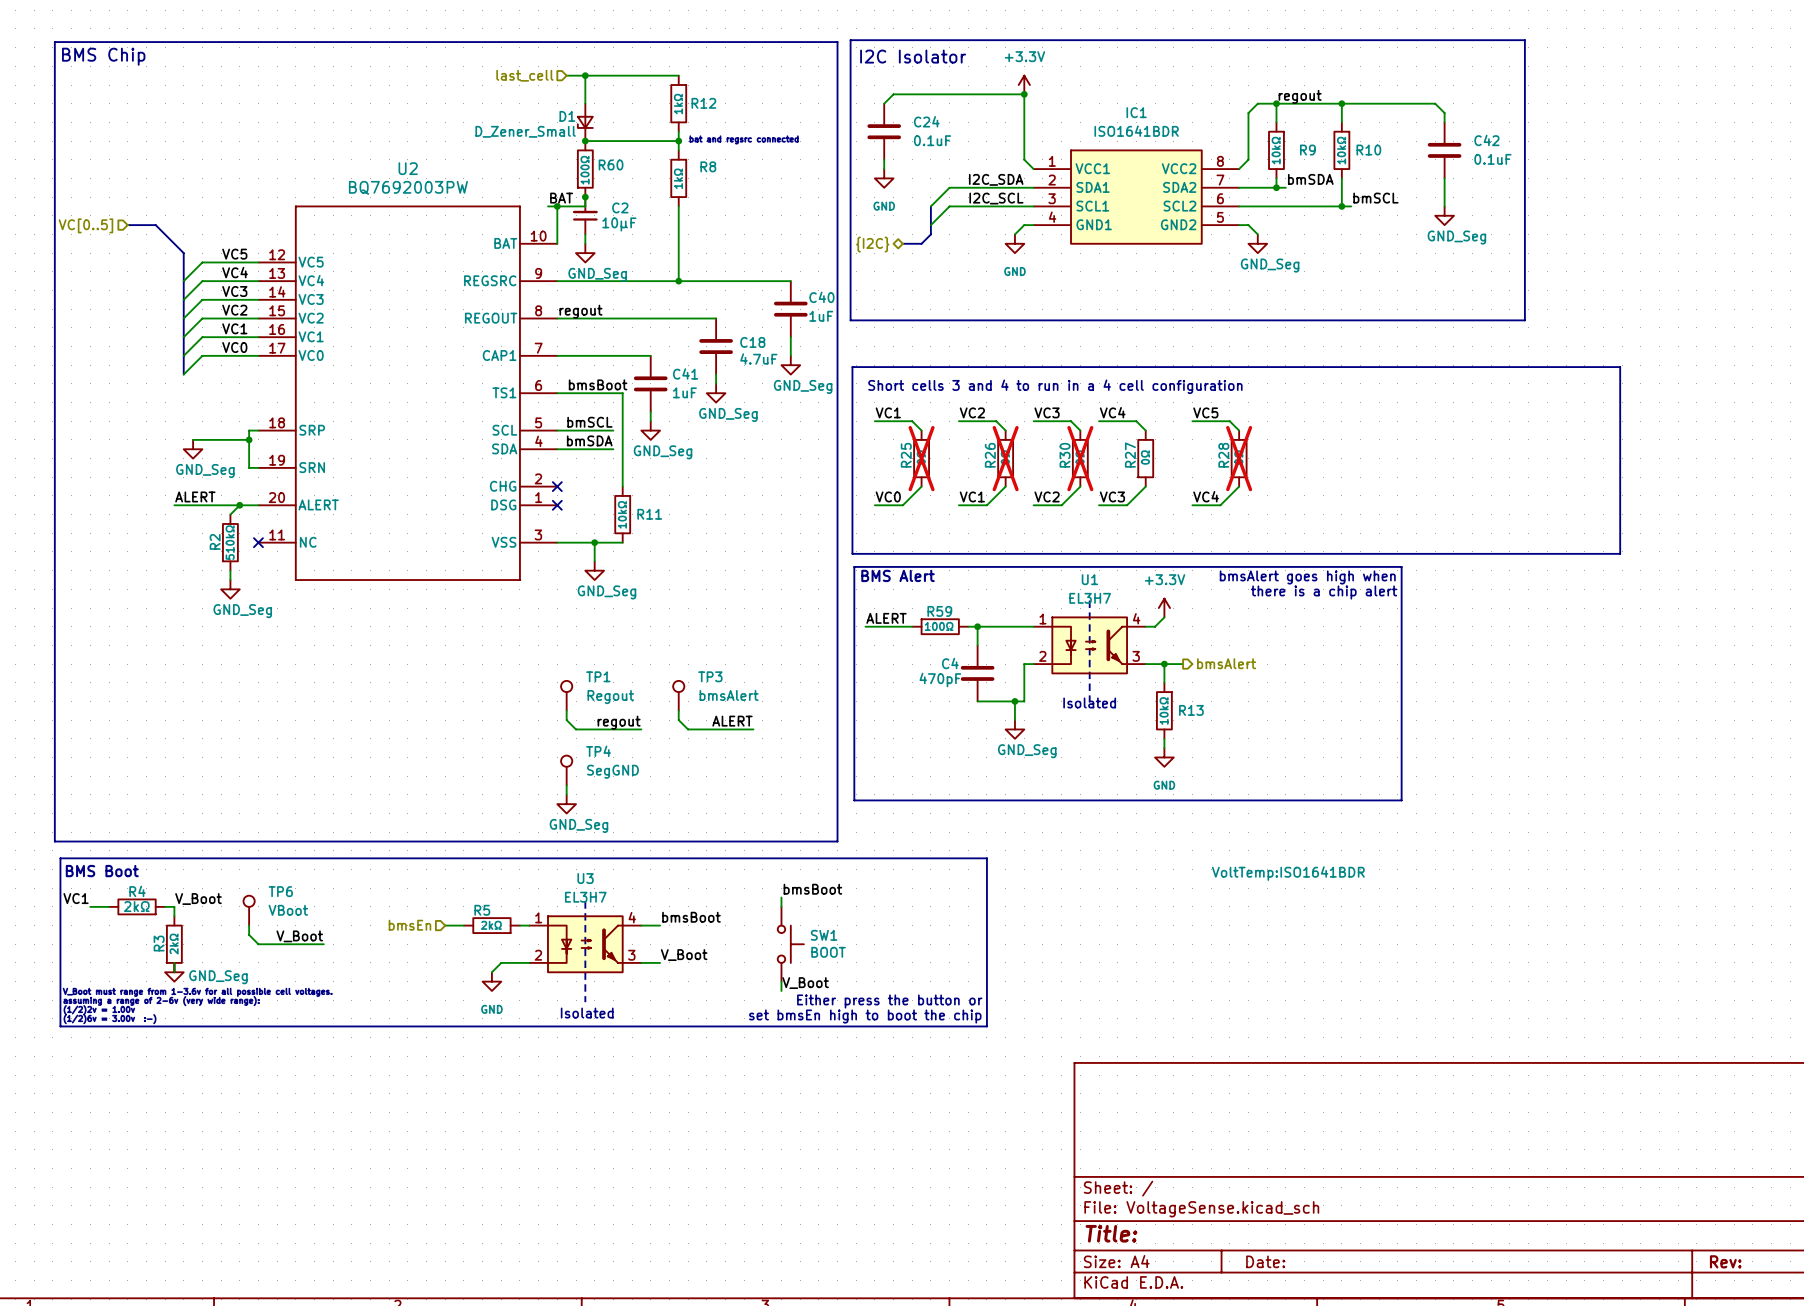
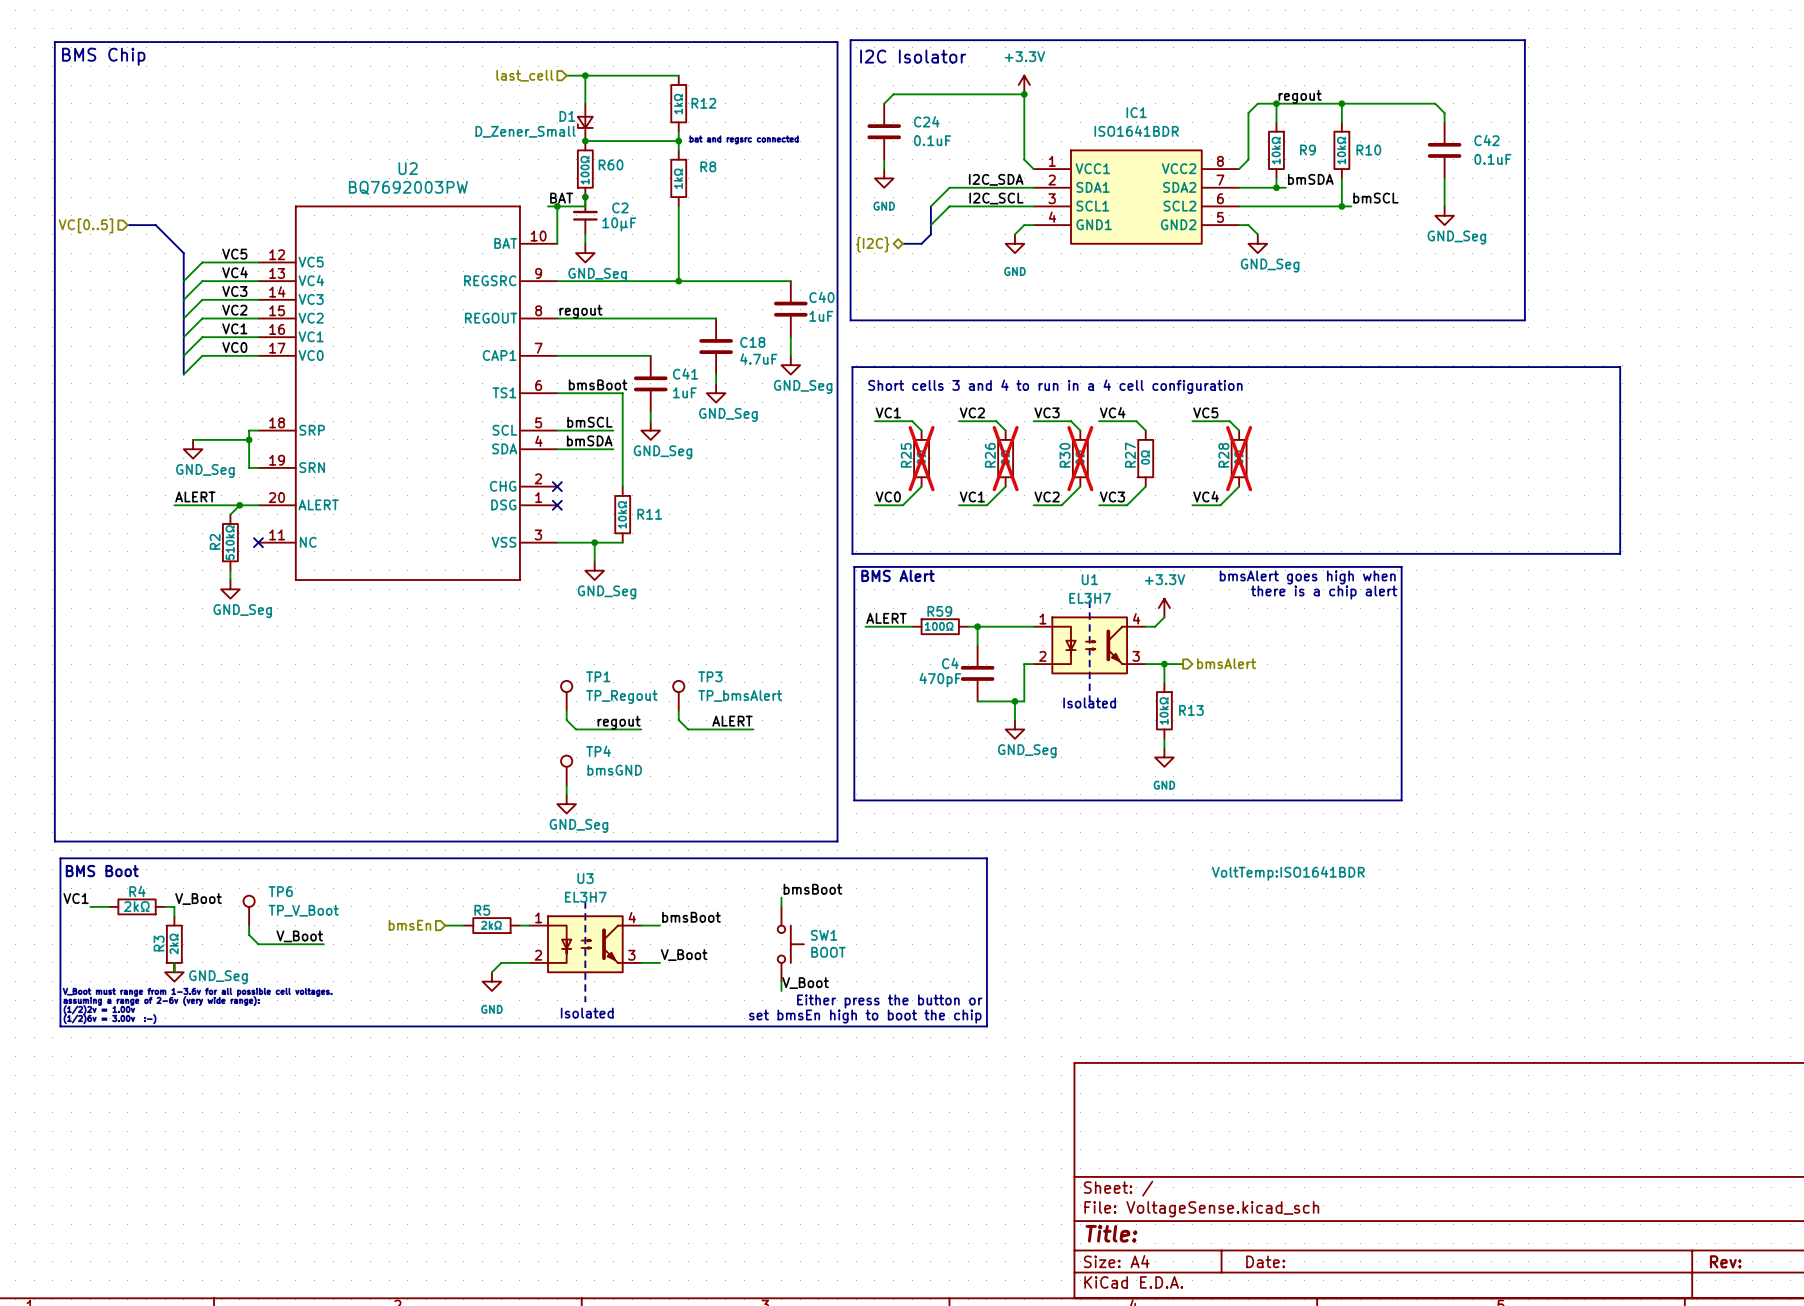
TP3 value: bmsAlert (729, 695) -> TP_bmsAlert (740, 695)
TP1 value: Regout (610, 697) -> TP_Regout (621, 697)
TP4 value: SegGND (612, 771) -> bmsGND (614, 770)
TP6 value: VBoot (288, 910) -> TP_V_Boot (303, 910)

